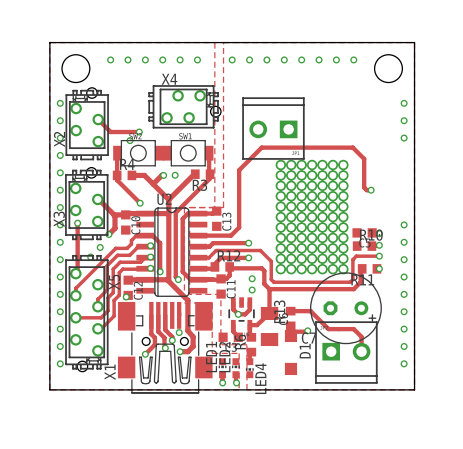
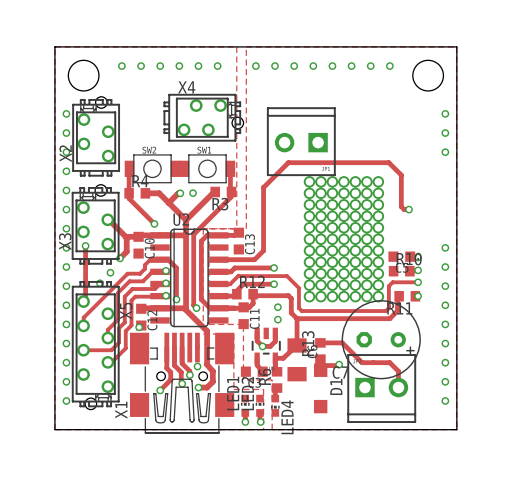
track: (98, 119) (110, 132) (139, 132) -> none
via: (139, 132) -> none
via: (130, 140) -> none

